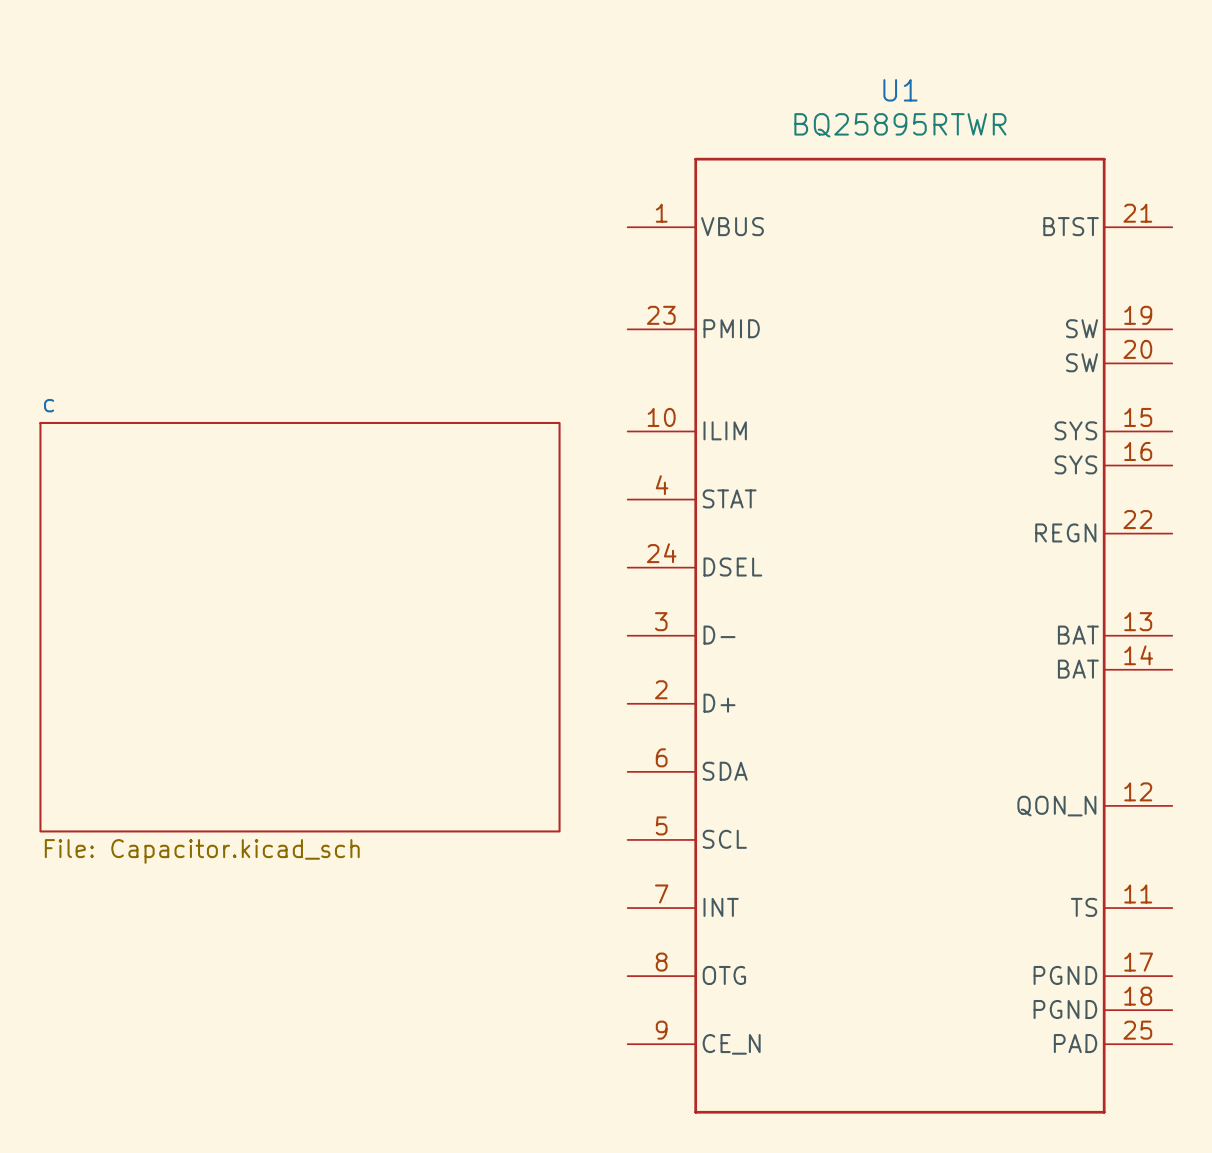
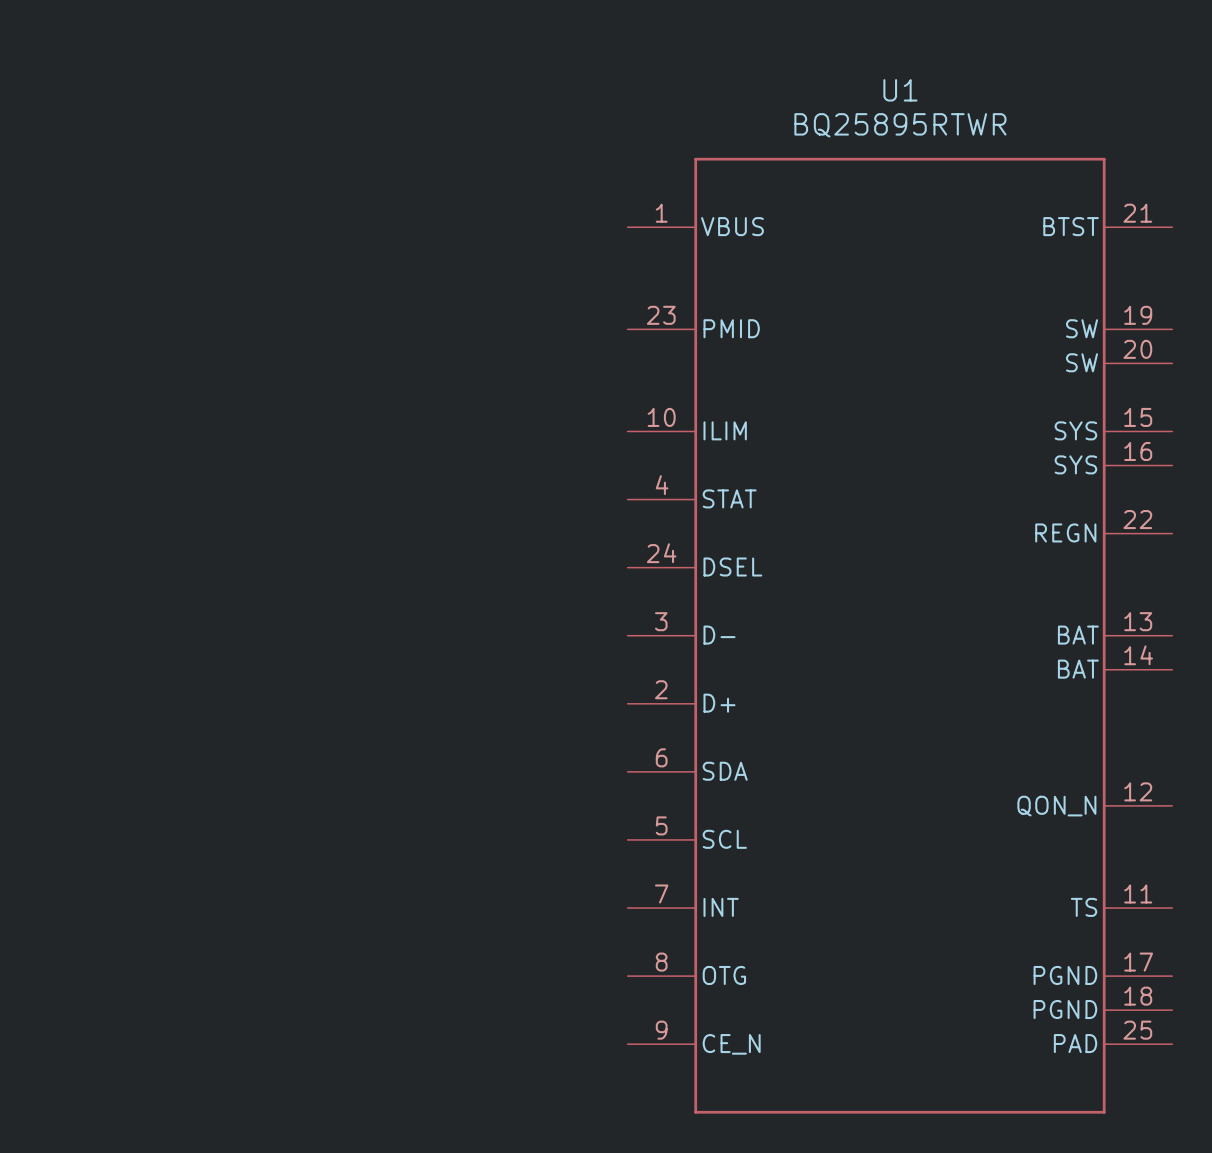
sheet c: File: Capacitor.kicad_sch (300, 627) -> none

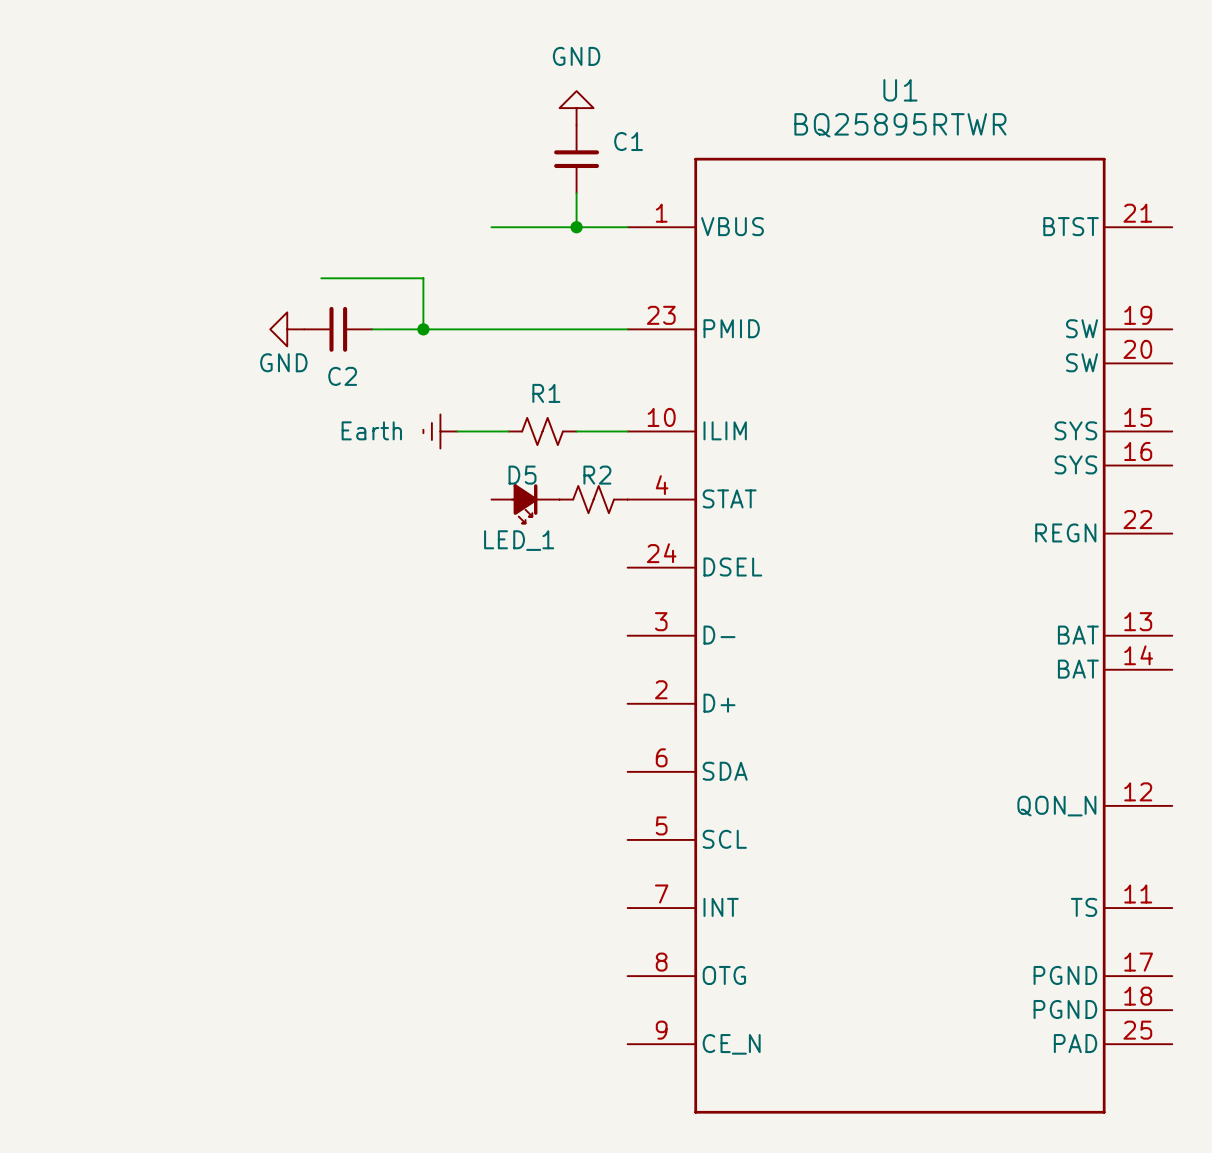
power symbol: none -> GND (576, 108)
C1: none -> (576, 159)
wire: none -> (576, 193) (576, 227)
wire: none -> (491, 227) (627, 227)
junction: none -> (576, 227)
wire: none -> (321, 278) (423, 278) (423, 329)
power symbol: none -> GND (287, 329)
C2: none -> (338, 329)
wire: none -> (372, 329) (627, 329)
junction: none -> (423, 329)
power symbol: none -> Earth (440, 431)
wire: none -> (457, 431) (508, 431)
R1: none -> (542, 431)
wire: none -> (576, 431) (627, 431)
R2: none -> (593, 499)
D5: none -> LED_1 (525, 503)

